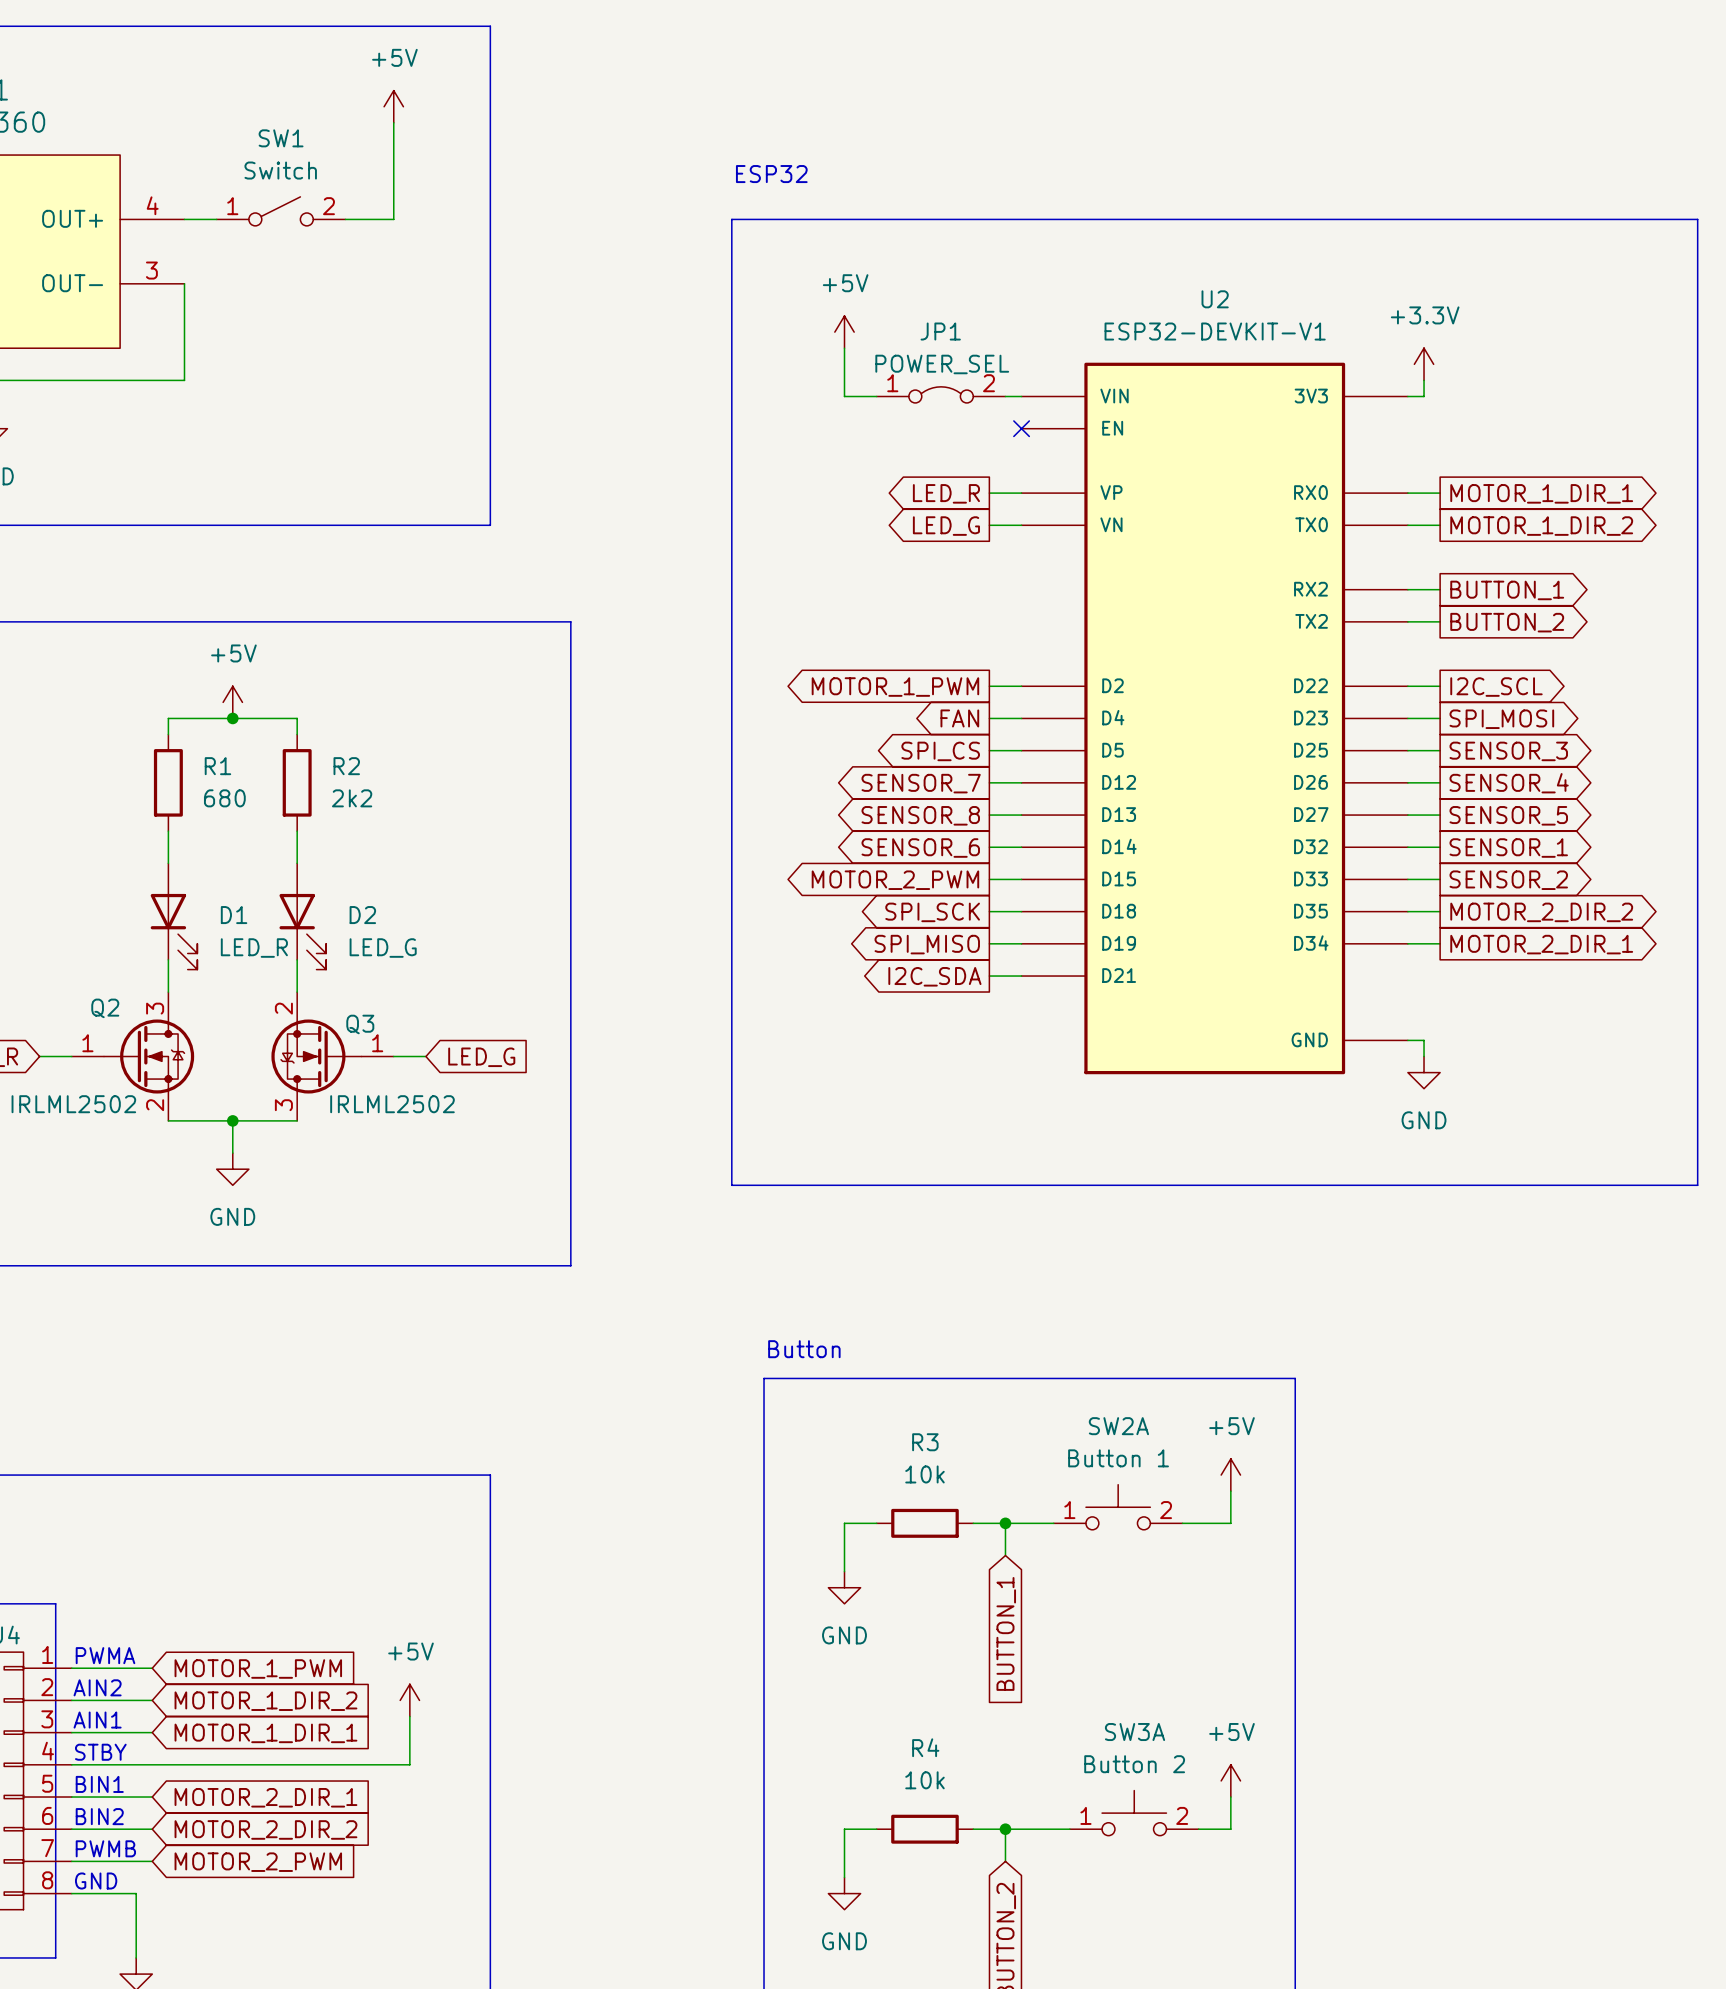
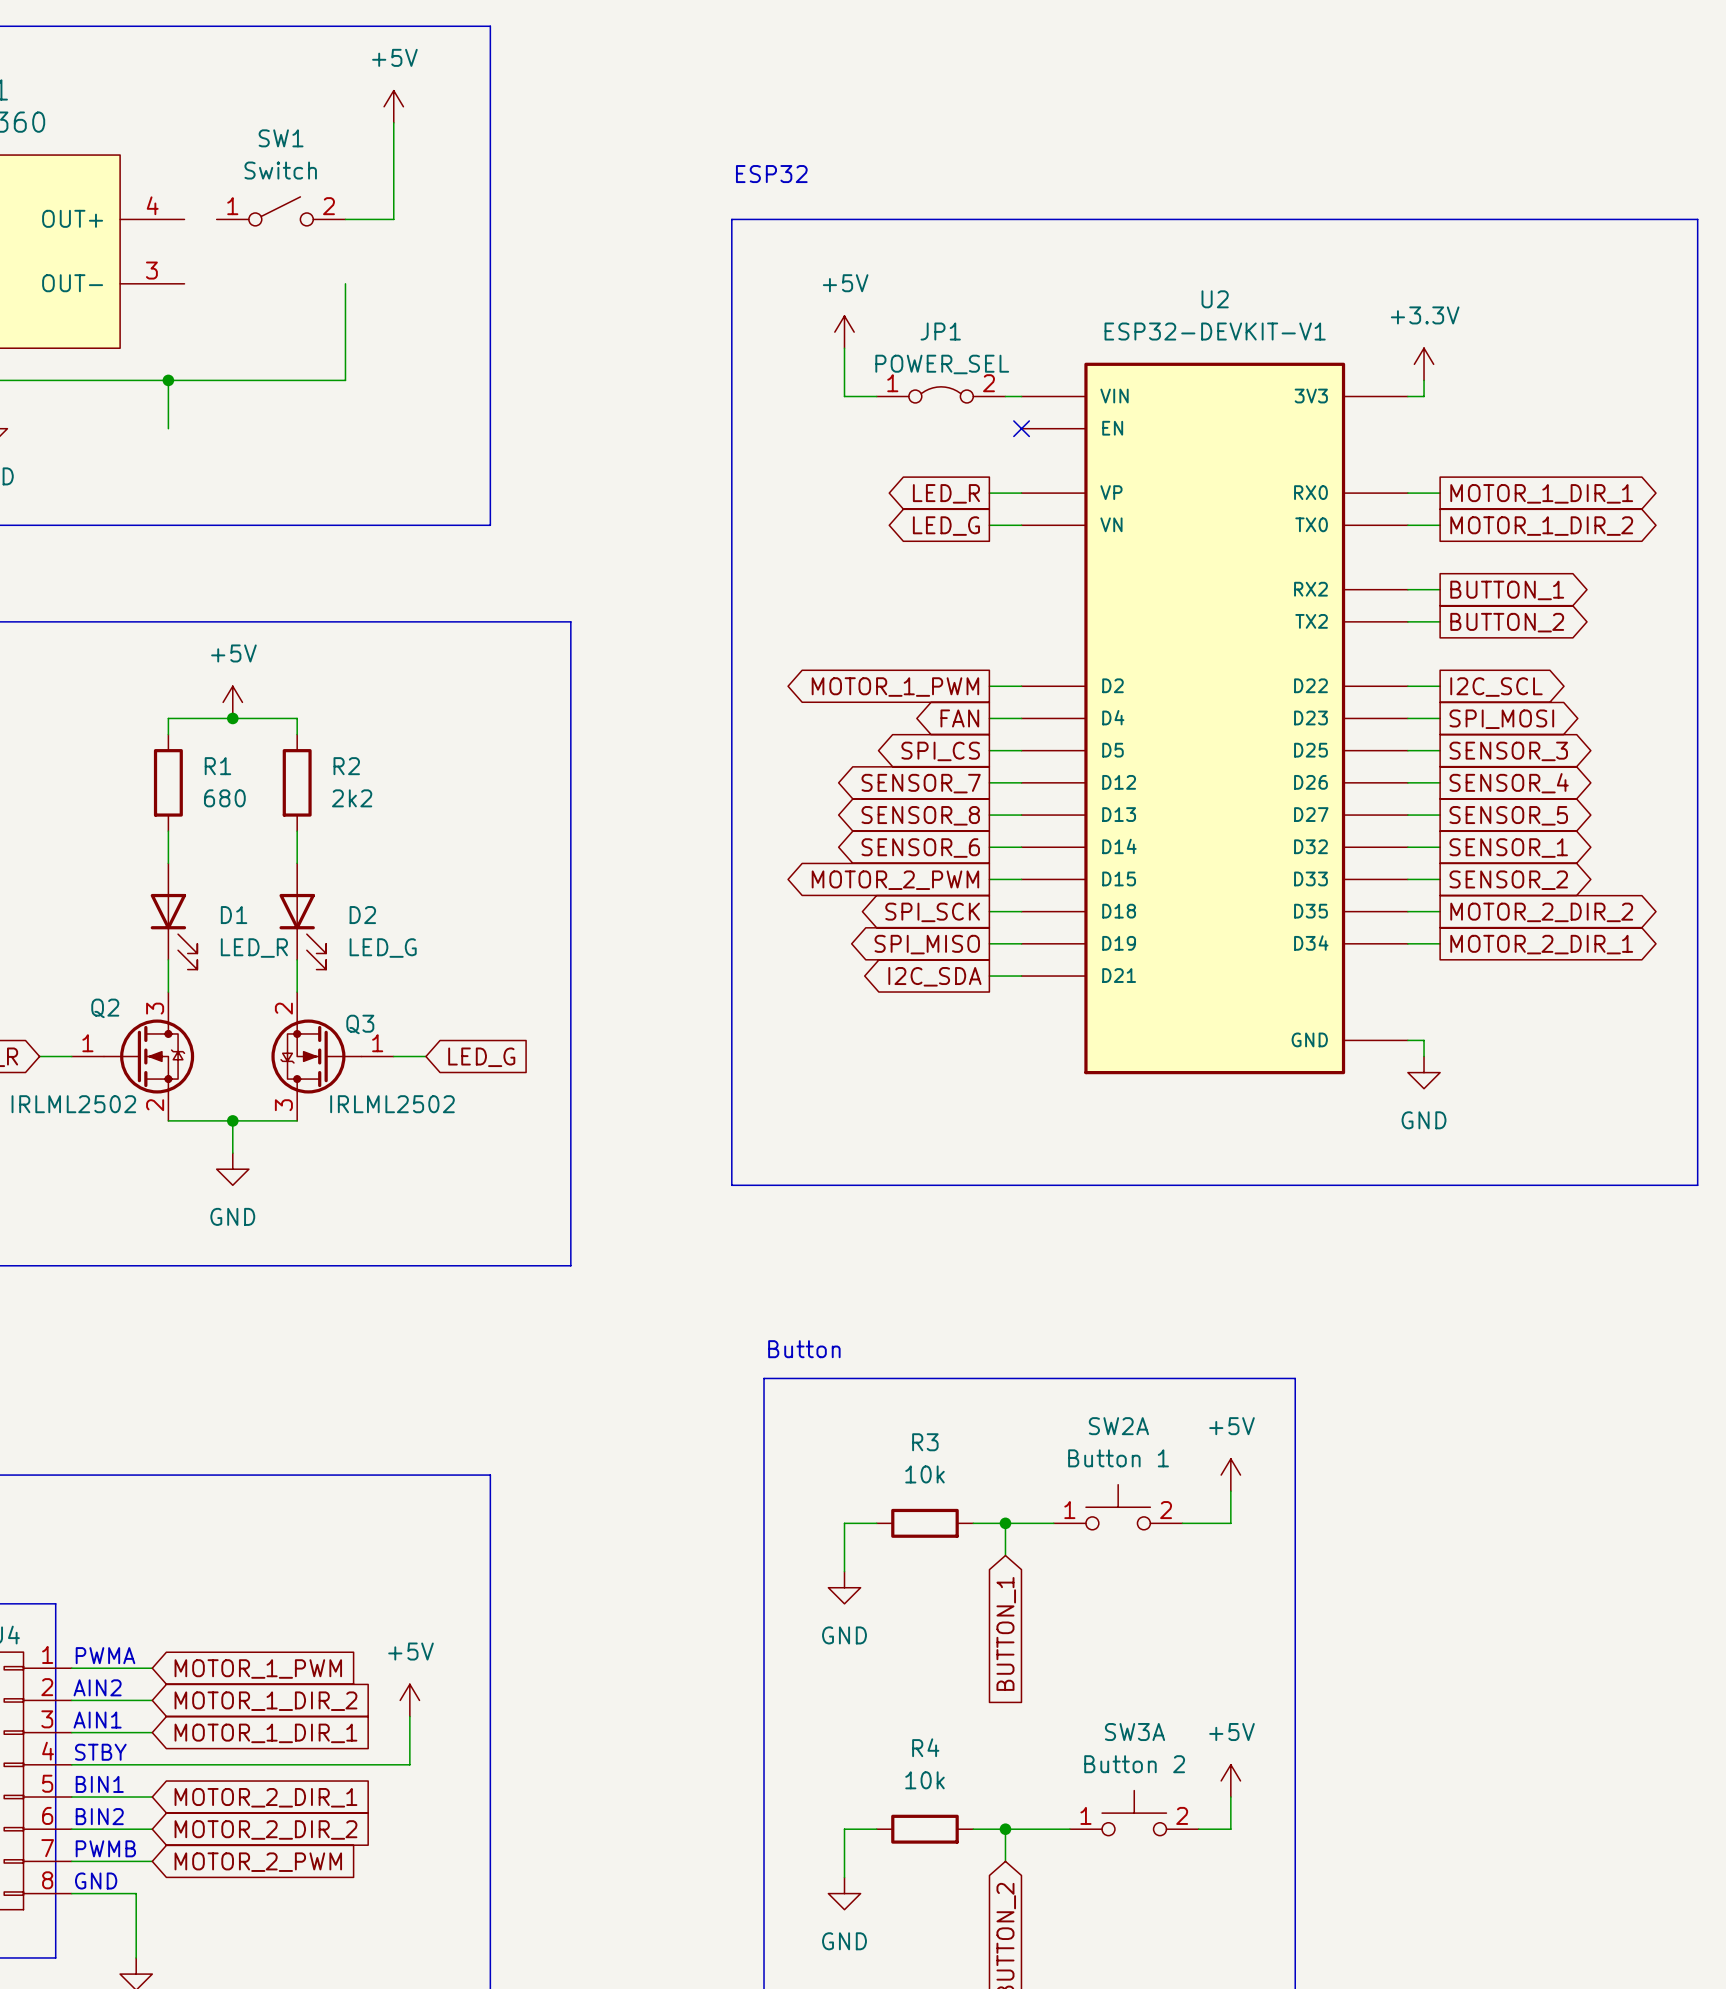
wire: (184, 219) (216, 219) -> none
wire: (184, 283) (184, 380) -> (345, 283) (345, 380) (184, 380)
wire: none -> (168, 380) (168, 428)
junction: none -> (168, 380)

